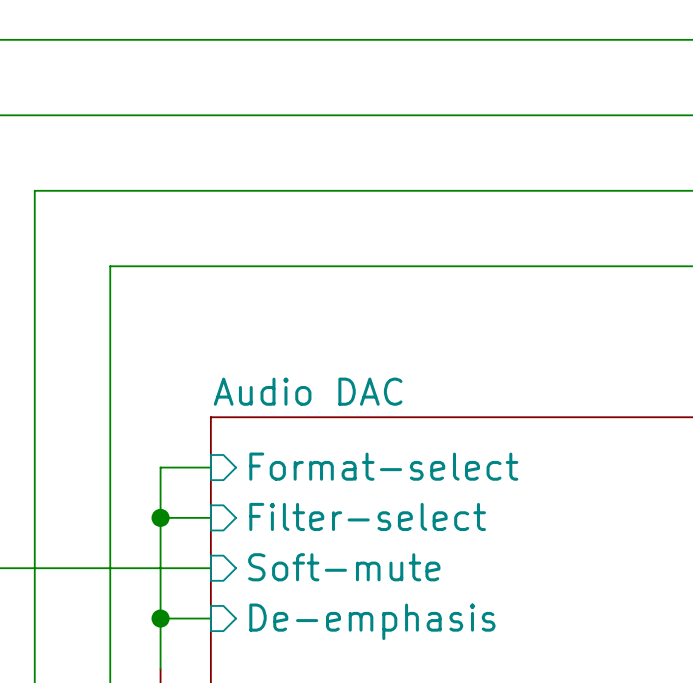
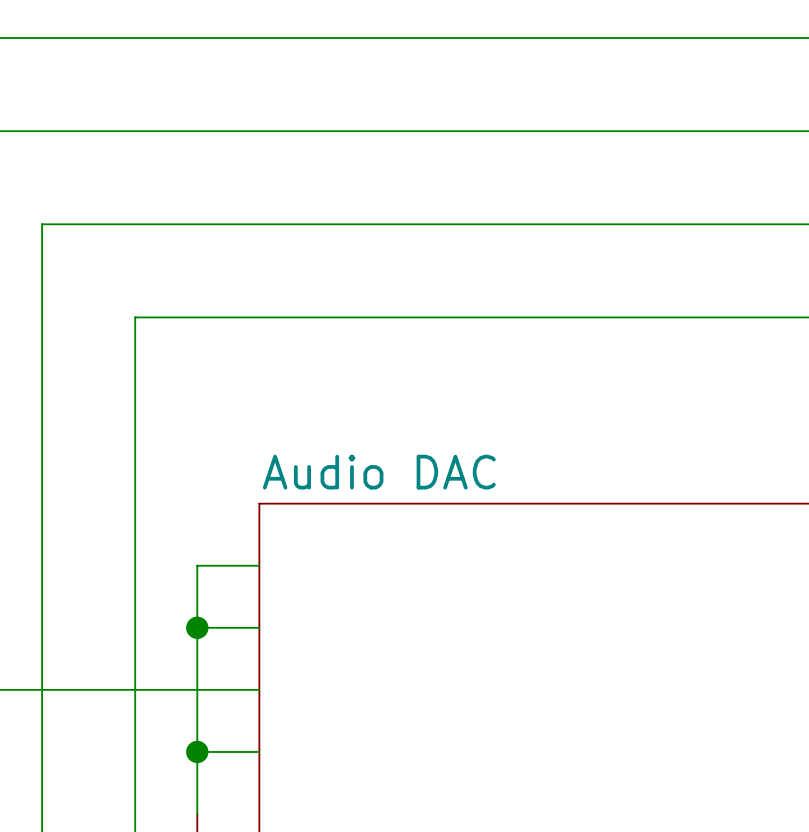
sheet pin: Format-select (383, 466) -> none
sheet pin: Filter-select (367, 516) -> none
sheet pin: Soft-mute (344, 567) -> none
sheet pin: De-emphasis (372, 621) -> none

